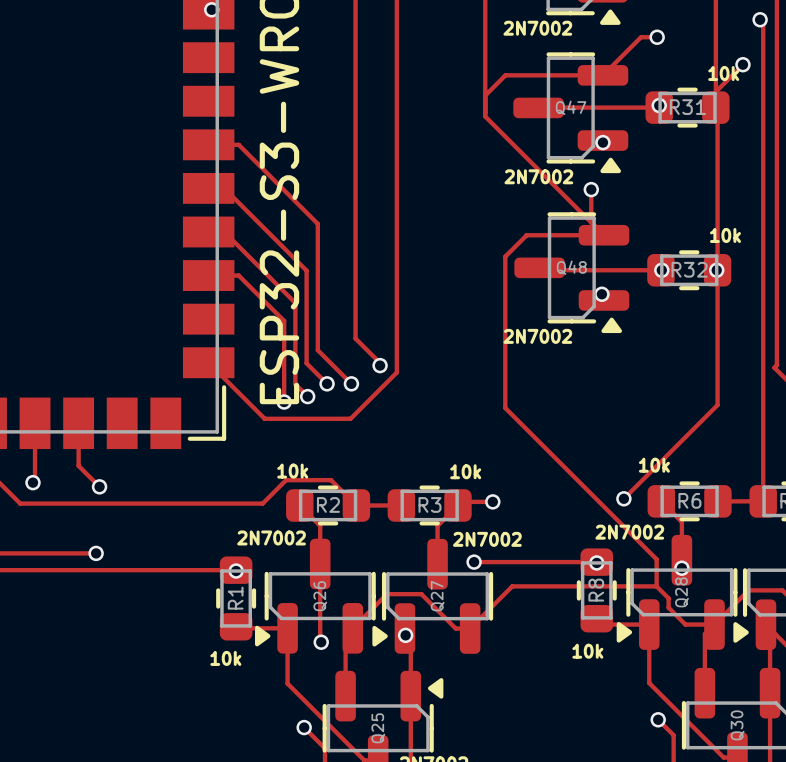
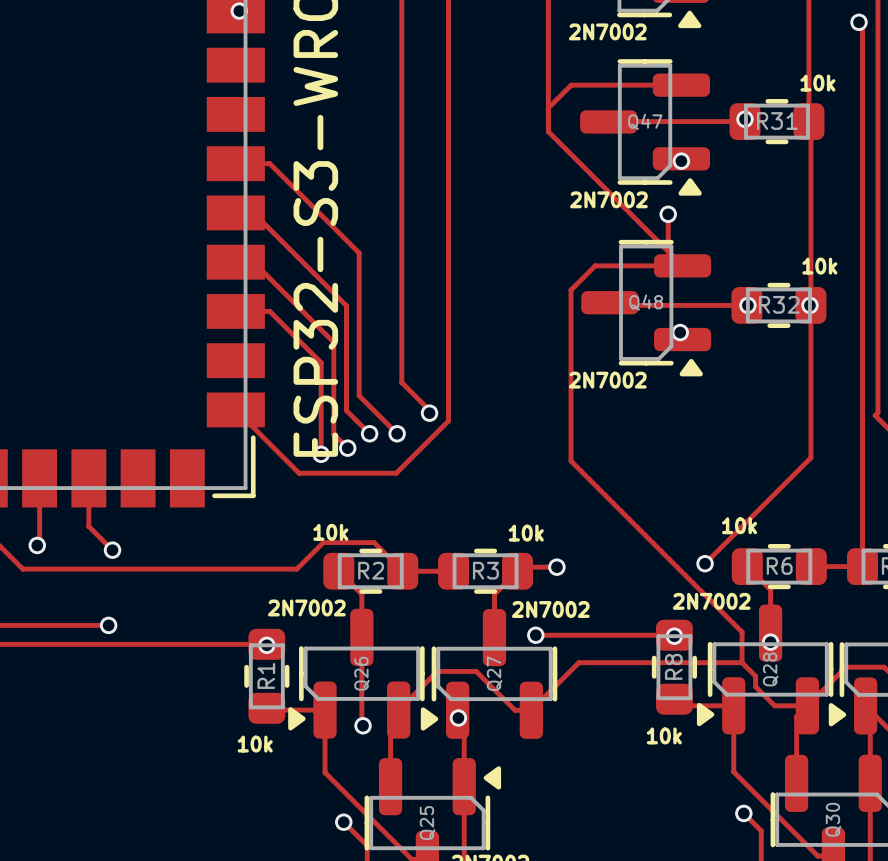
track: (657, 37) (641, 37) (602, 75) -> none
via: (657, 37) -> none
track: (742, 64) (715, 91) -> none
via: (742, 64) -> none

